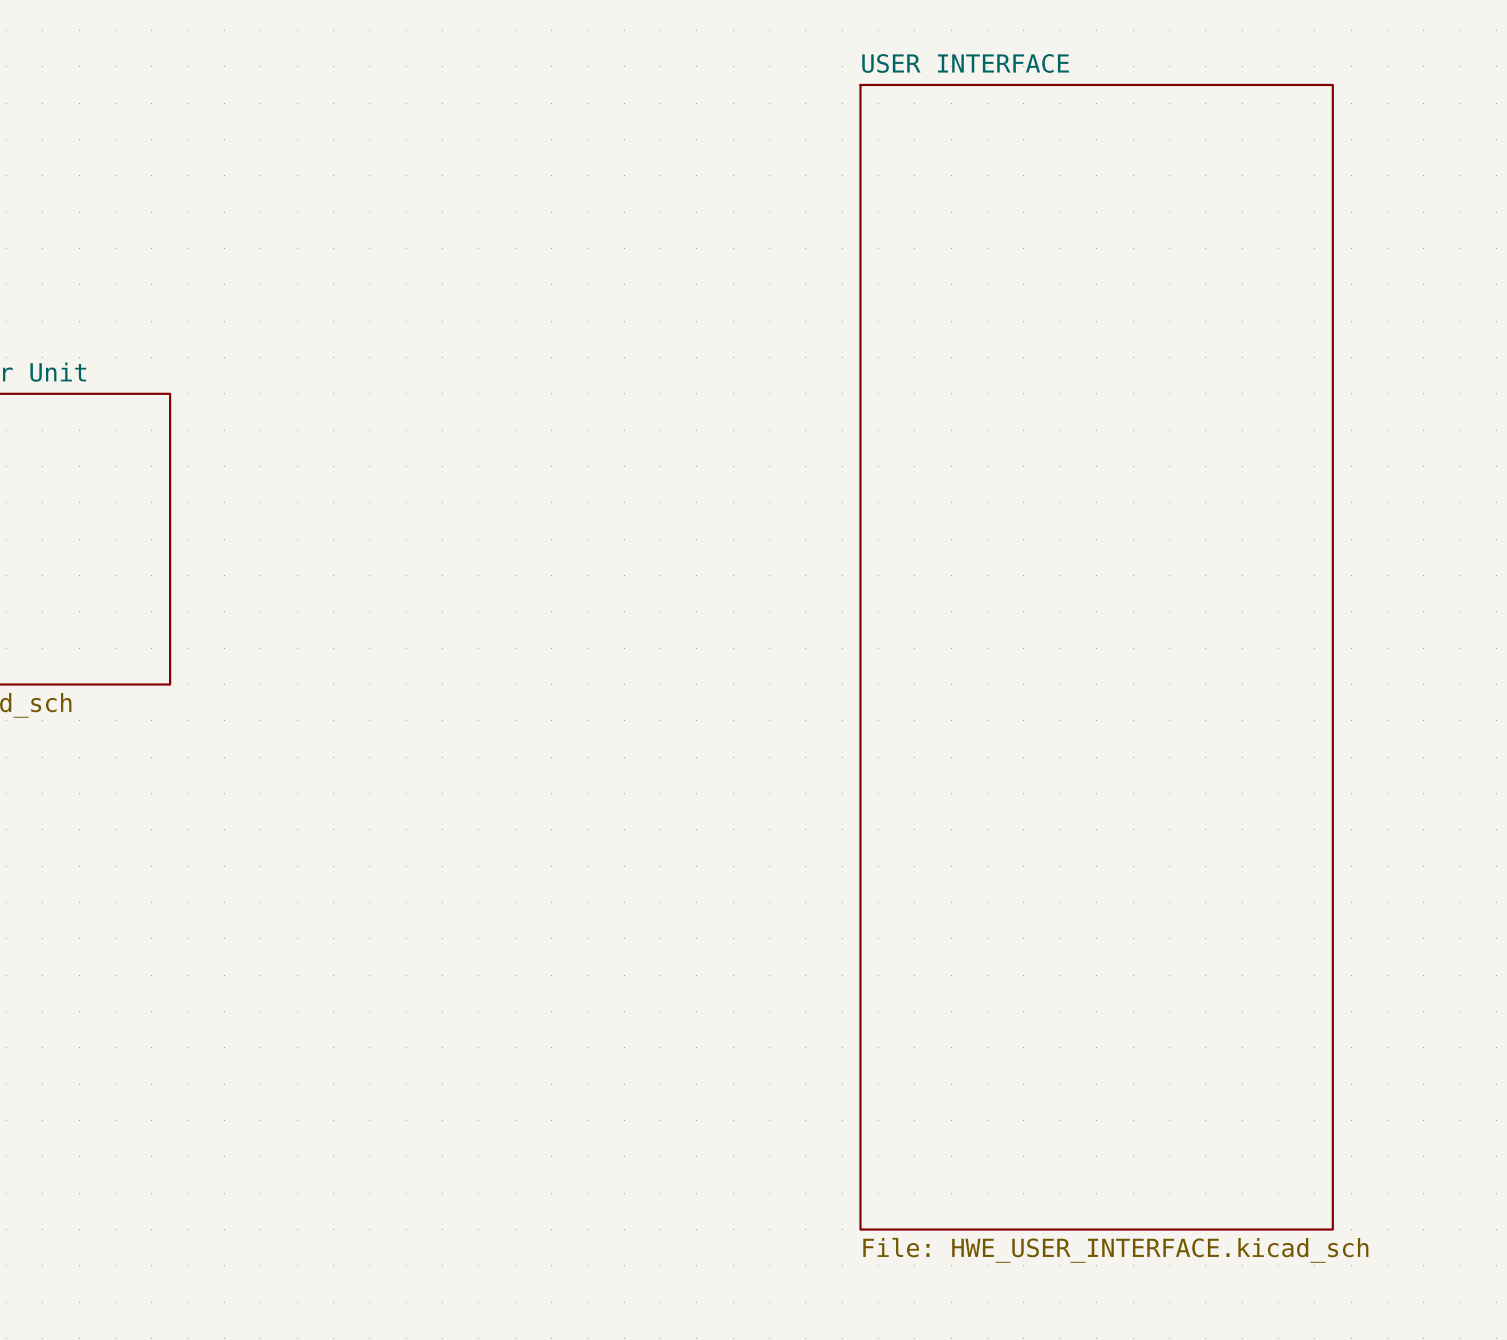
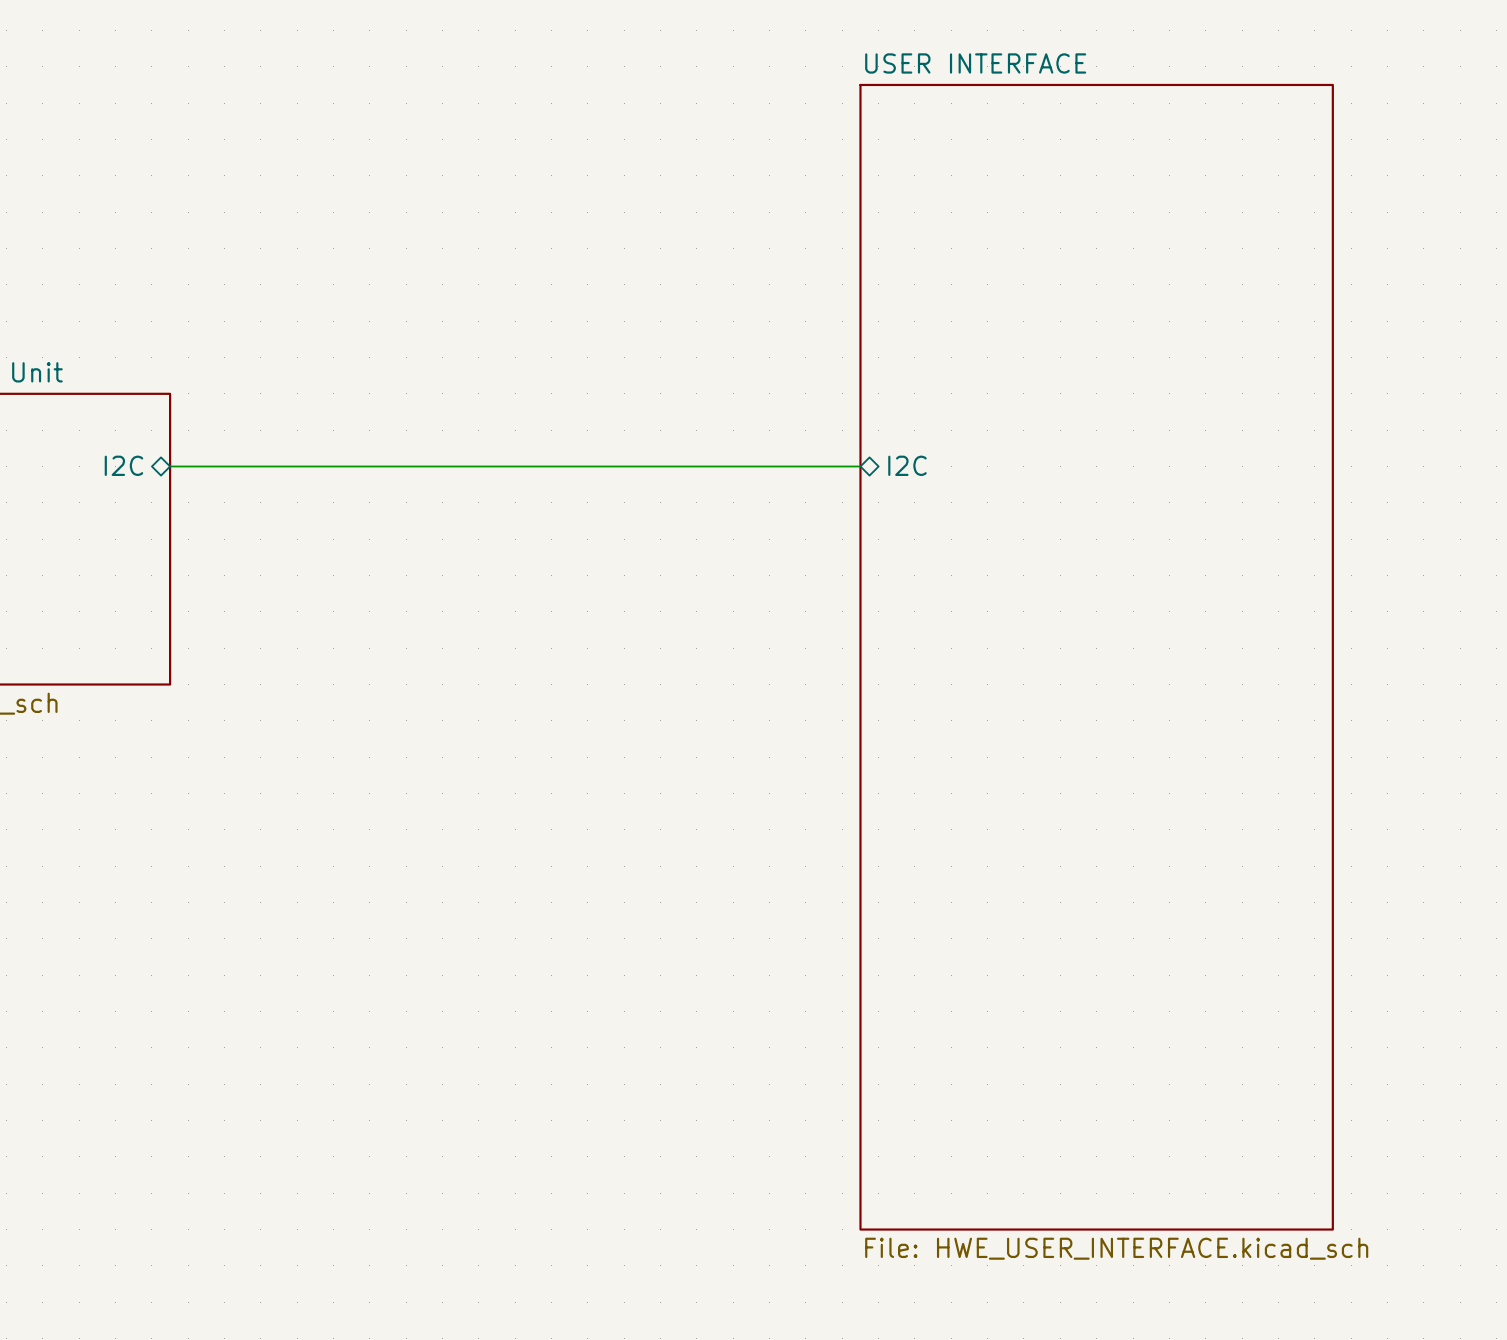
sheet pin: none -> I2C (123, 465)
sheet pin: none -> I2C (907, 465)
wire: none -> (170, 466) (860, 466)

